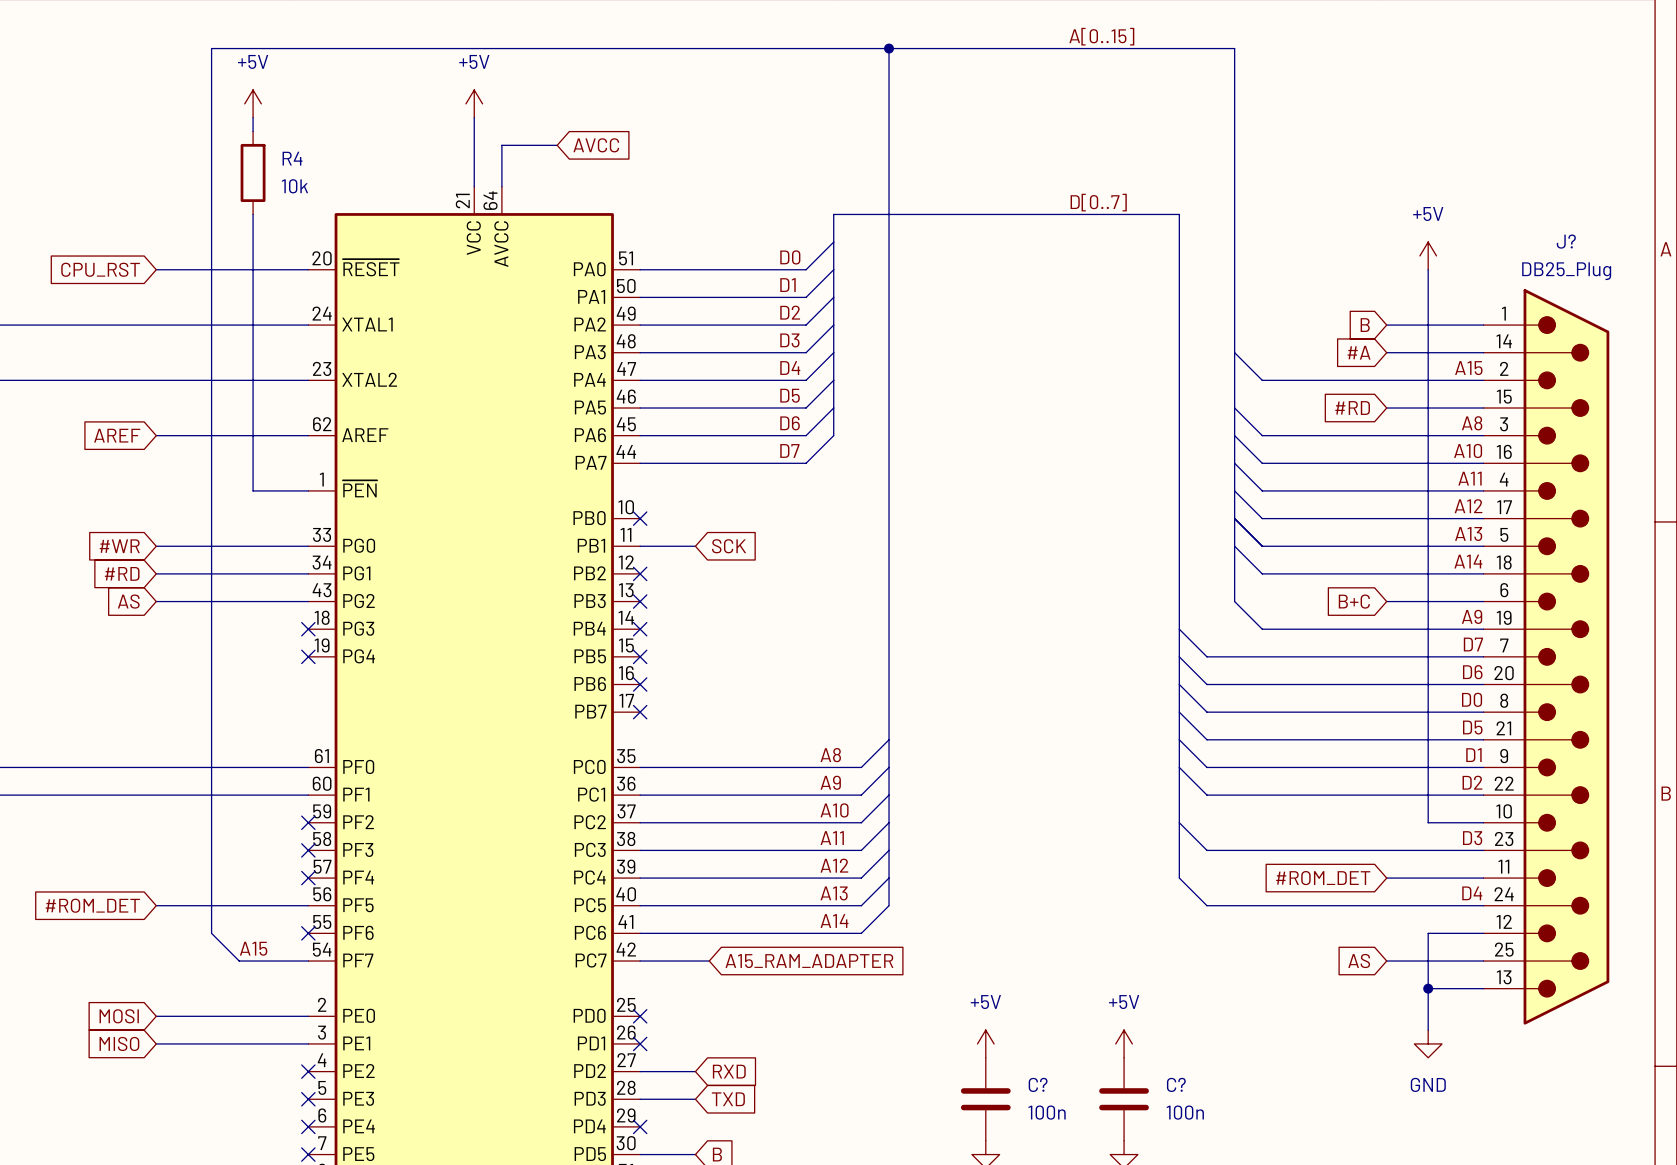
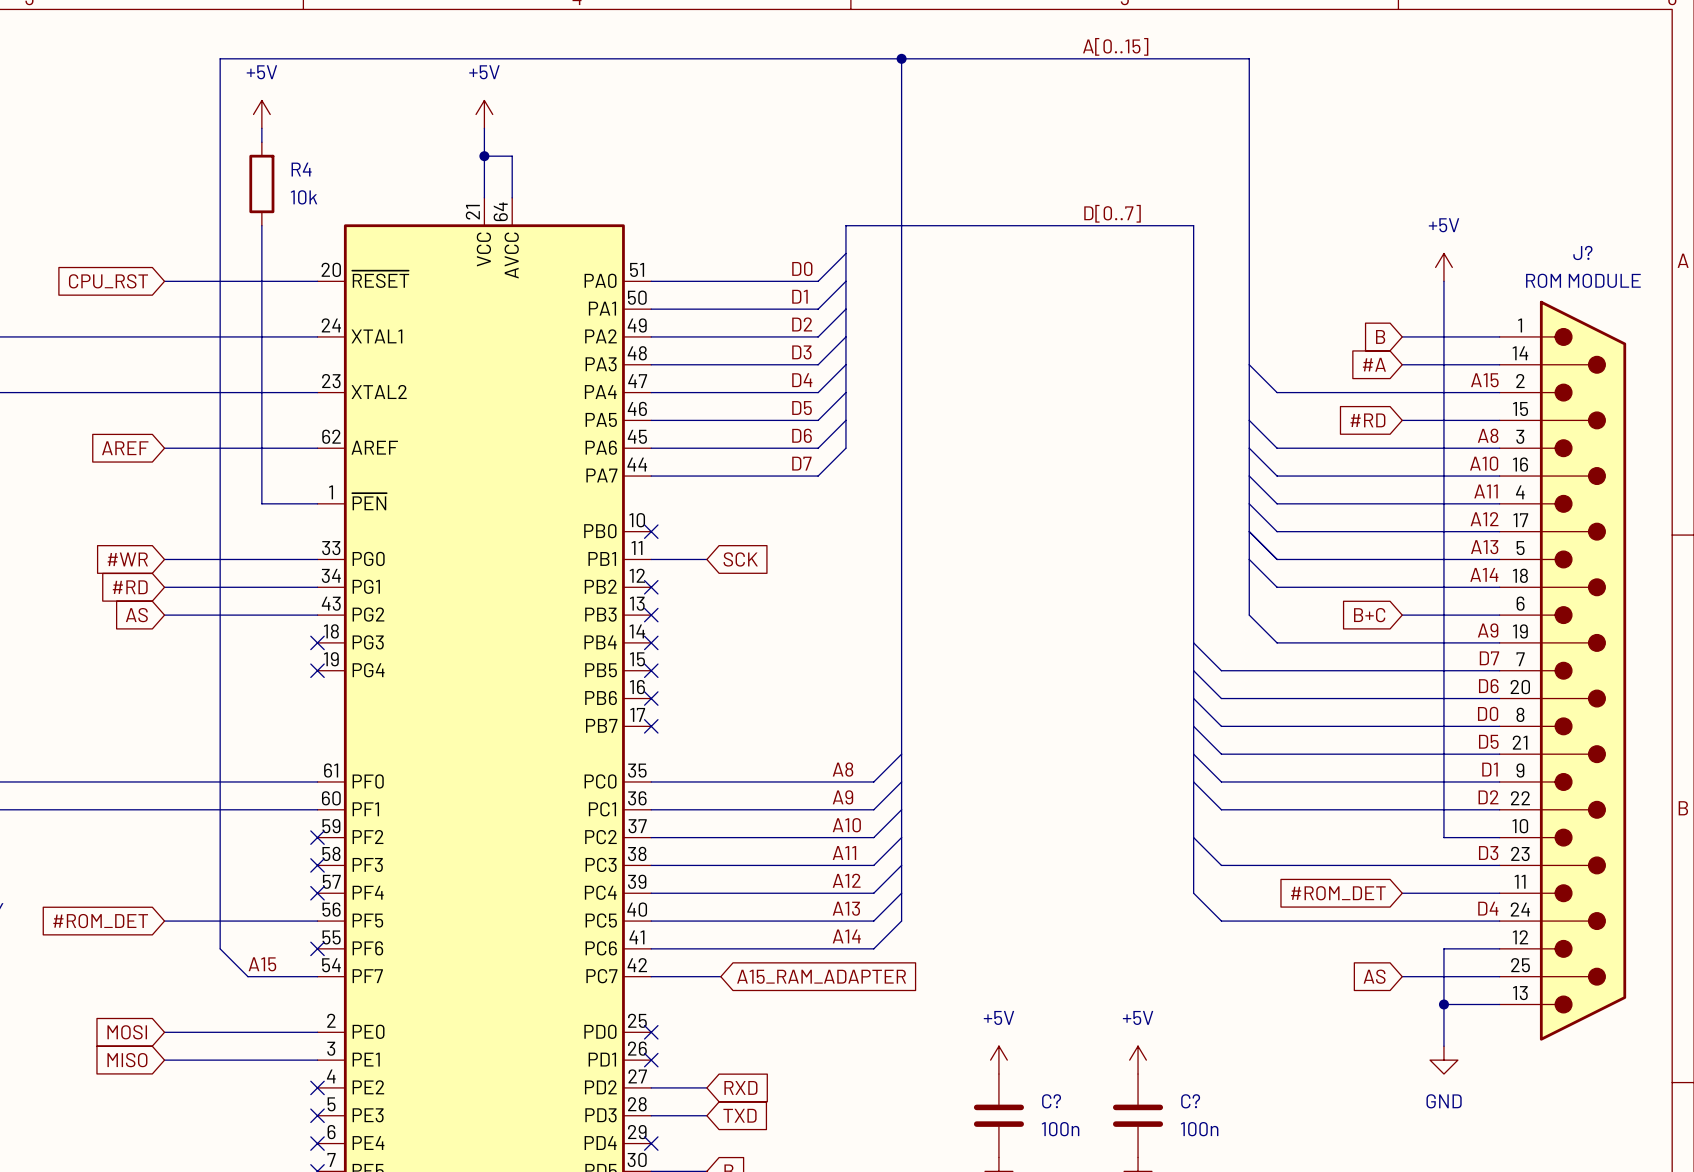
junction: none -> (484, 156)
wire: (501, 145) (557, 145) -> (512, 156) (484, 156)
global label: AVCC (596, 145) -> none
J? value: DB25_Plug (1566, 271) -> ROM MODULE (1583, 280)

